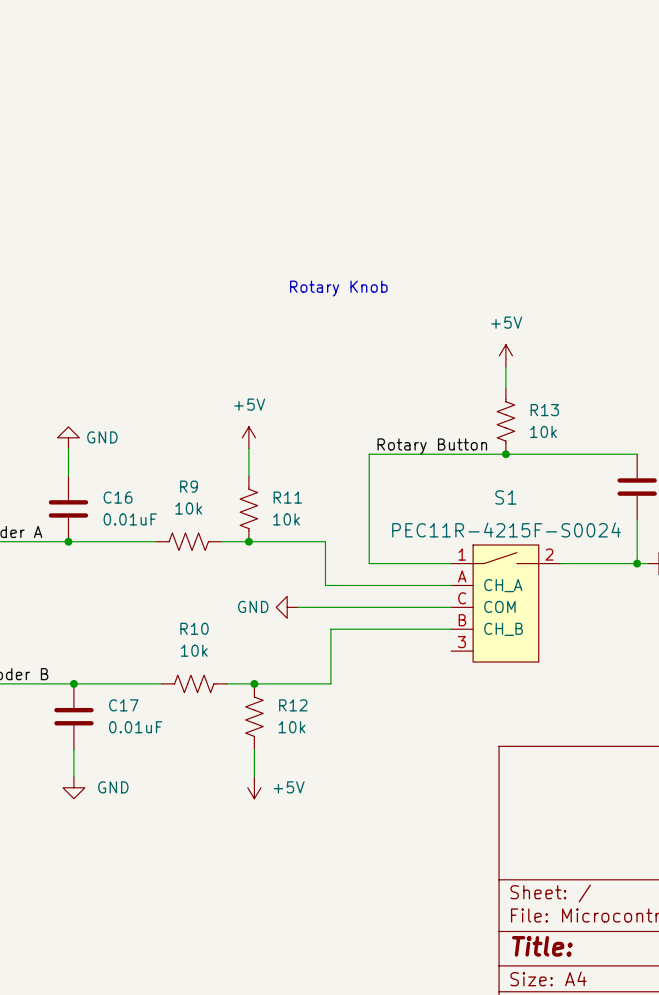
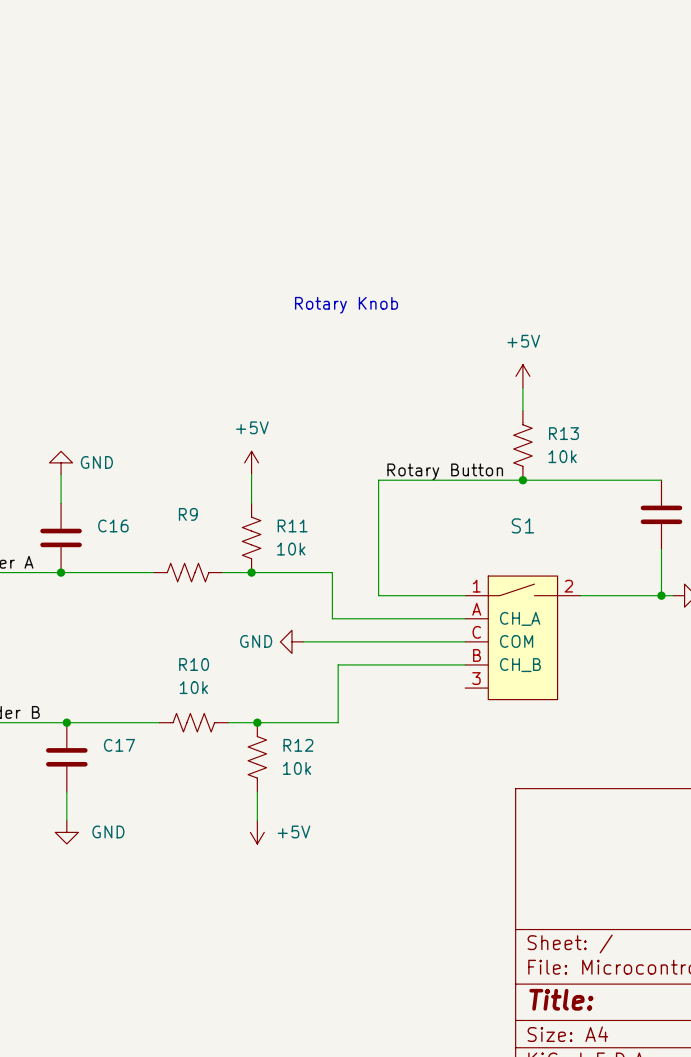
R9 value: 10k (188, 508) -> none
C16 value: 0.01uF (130, 519) -> none
S1 value: PEC11R-4215F-S0024 (506, 529) -> none
C17 value: 0.01uF (135, 727) -> none

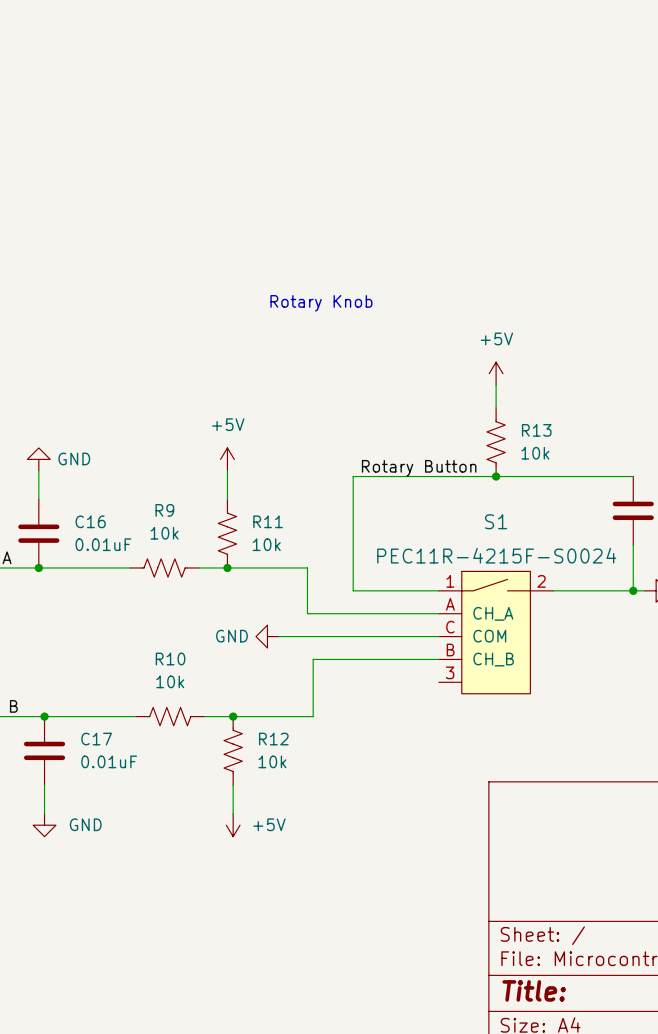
R9 value: none -> 10k (164, 533)
C16 value: none -> 0.01uF (103, 544)
S1 value: none -> PEC11R-4215F-S0024 (496, 555)
C17 value: none -> 0.01uF (109, 761)

